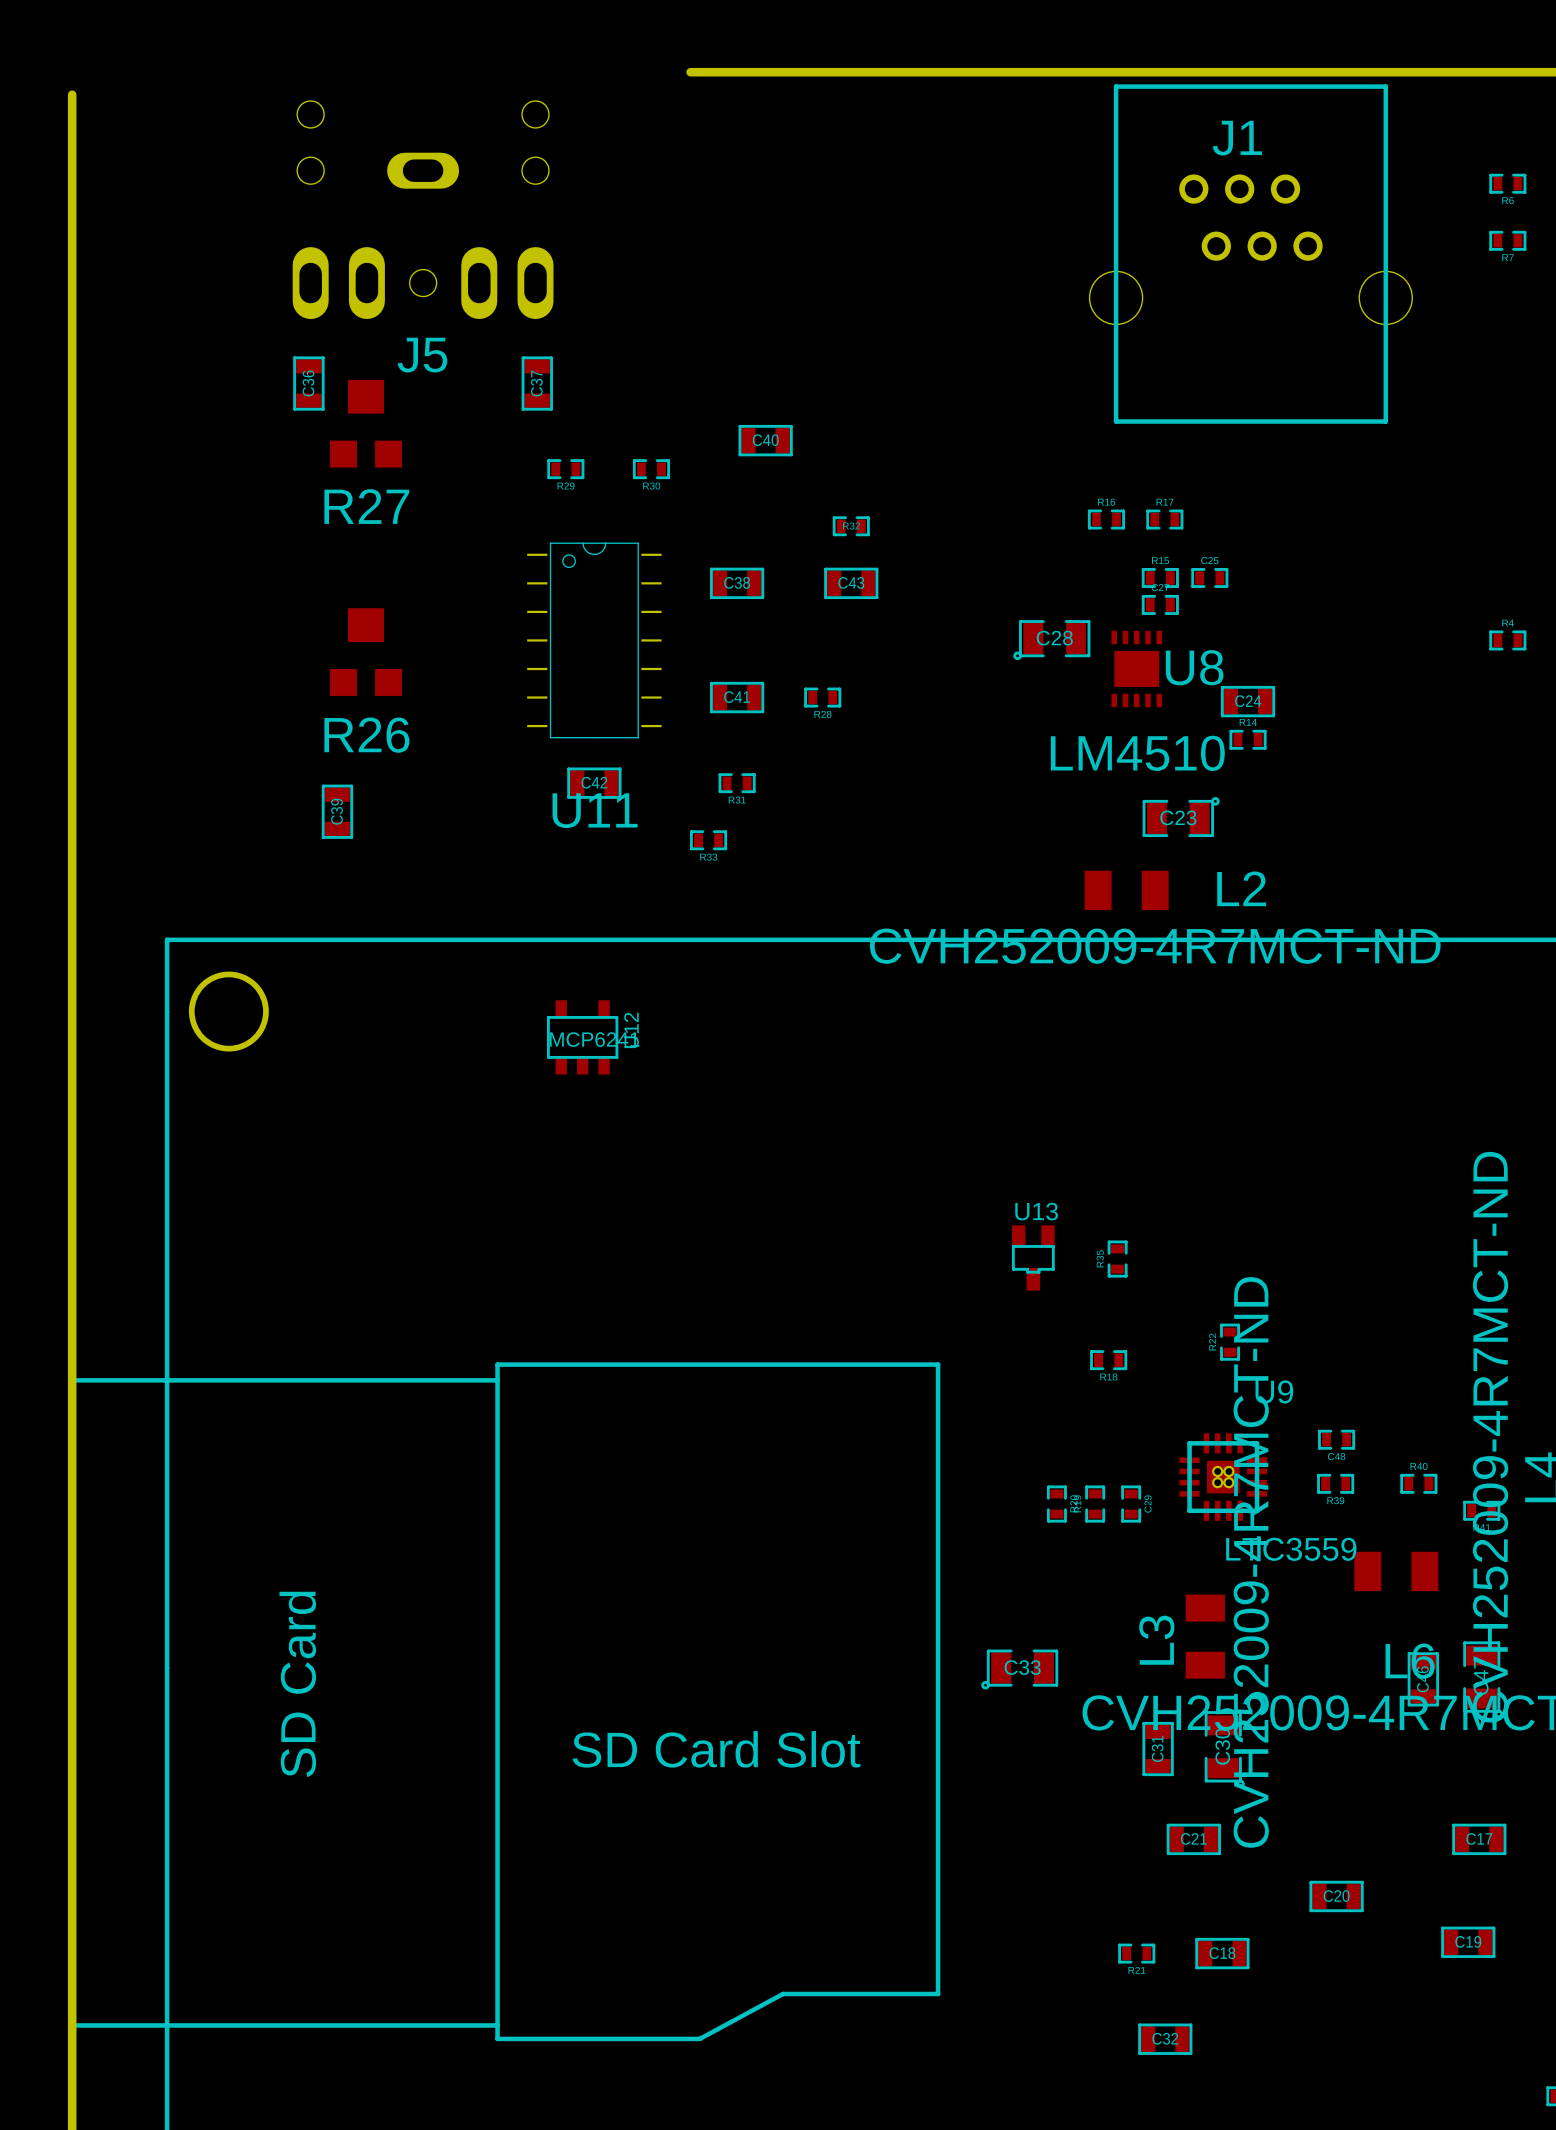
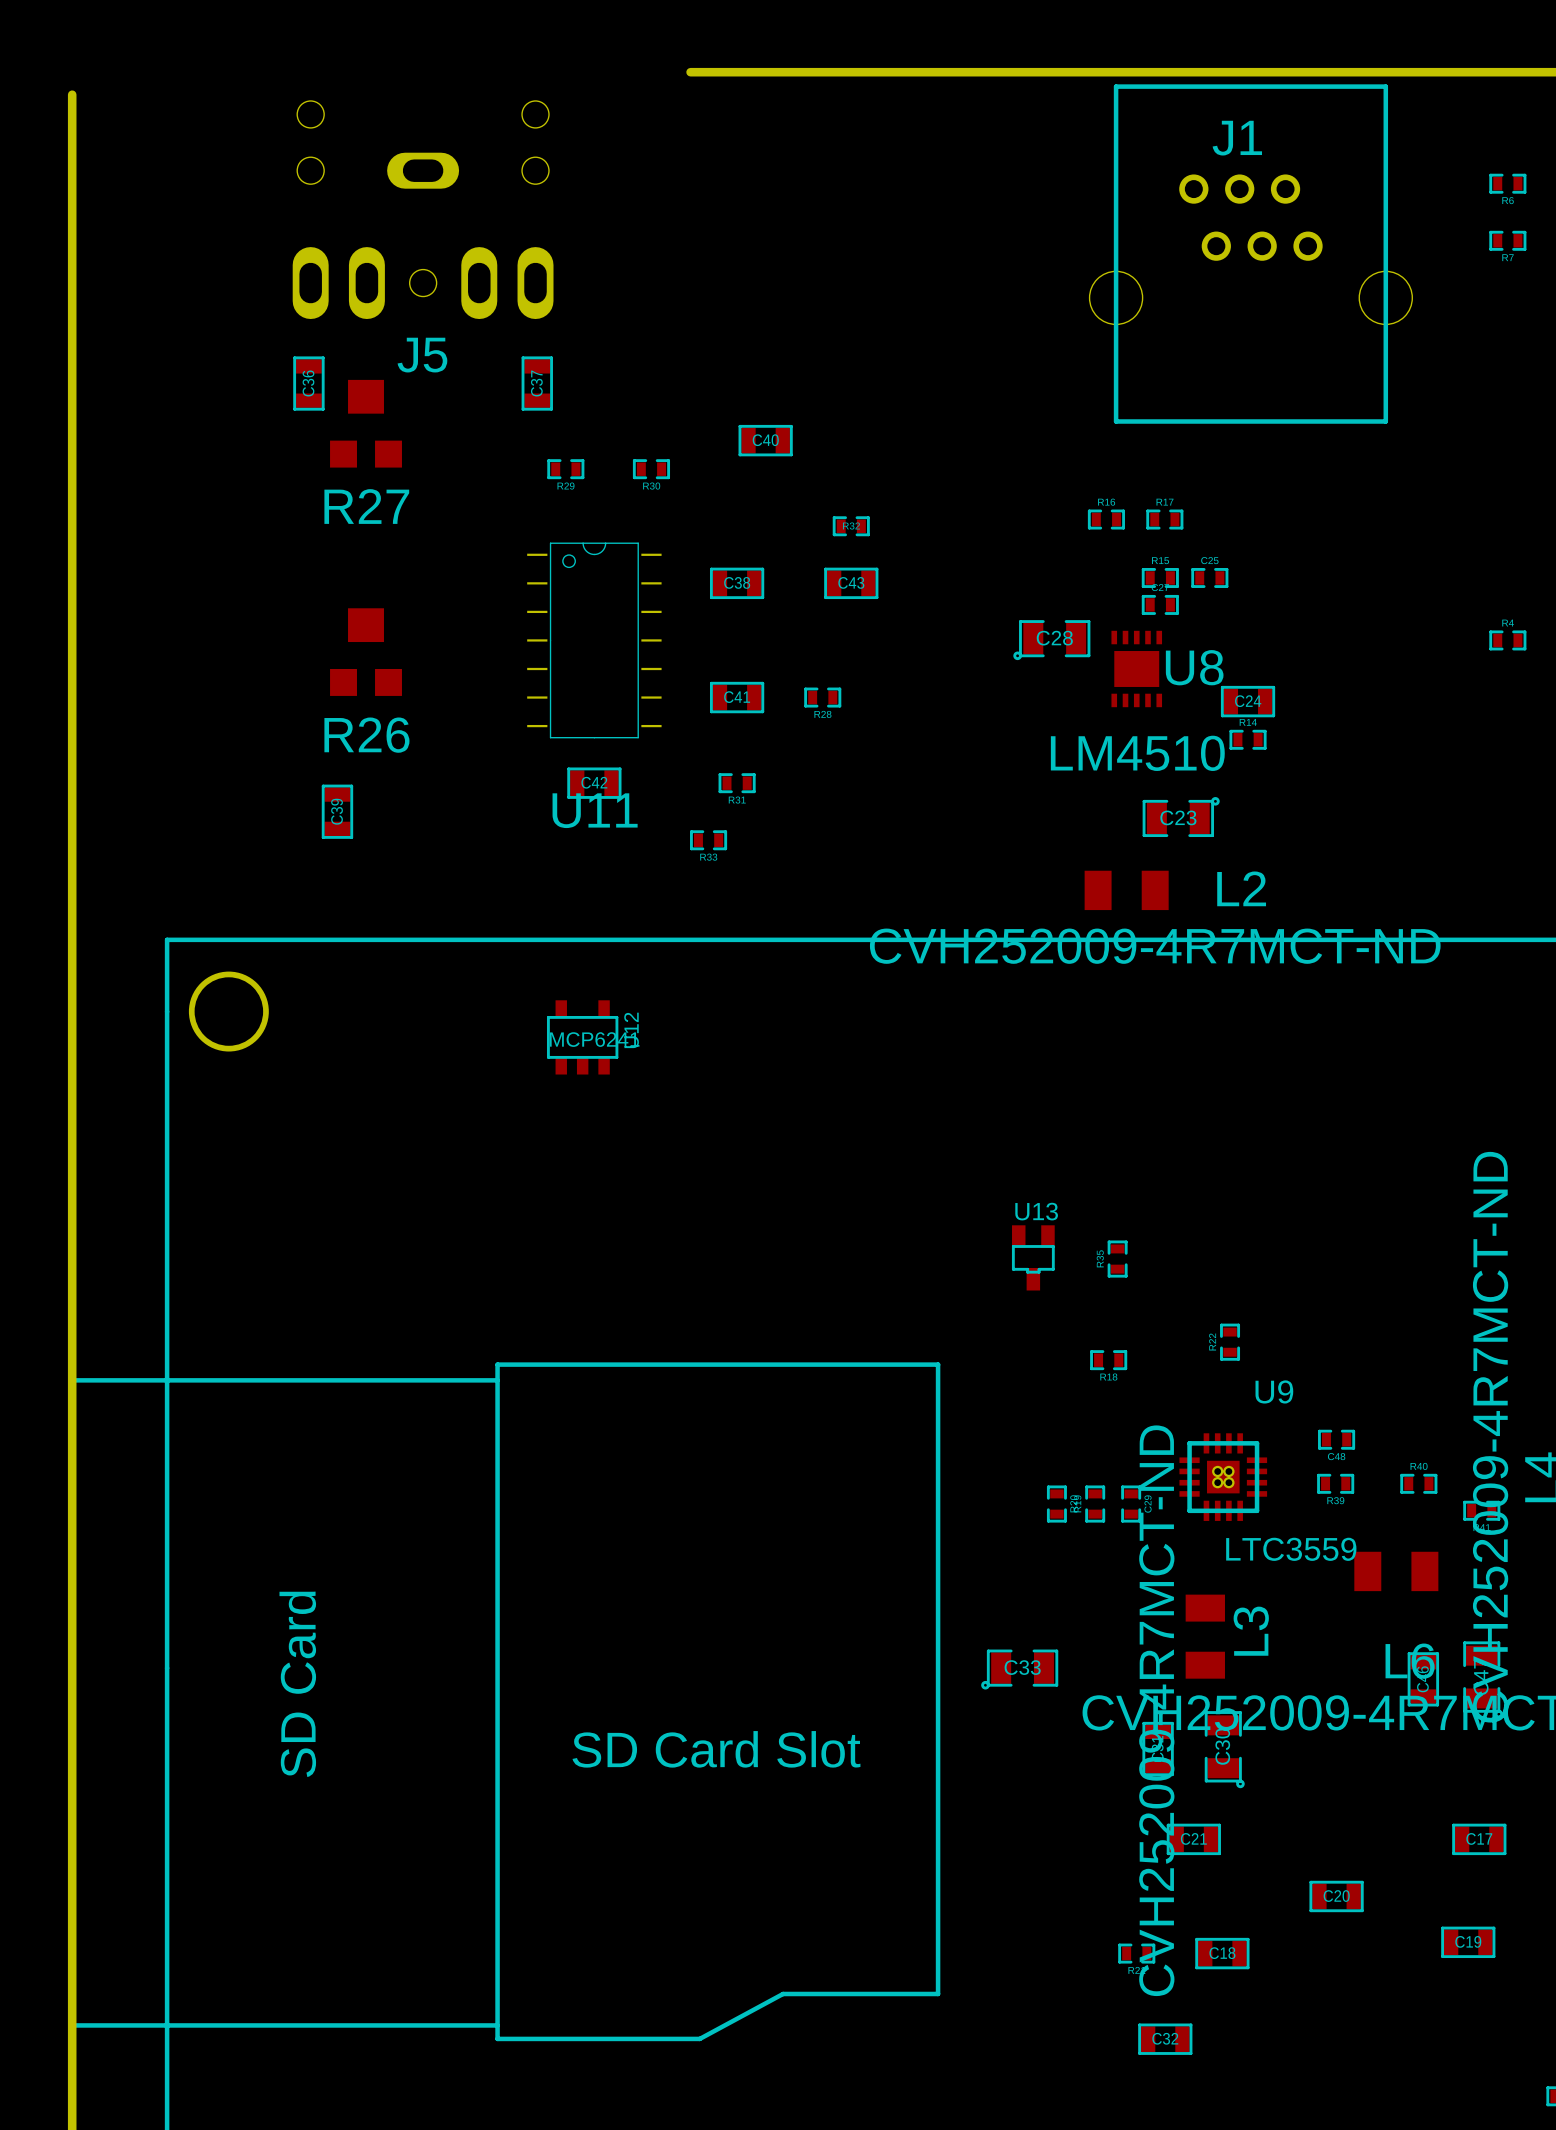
L3 value position: CVH252009-4R7MCT-ND (1251, 1562) -> CVH252009-4R7MCT-ND (1156, 1710)
L3 name position: L3 (1156, 1640) -> L3 (1251, 1631)

